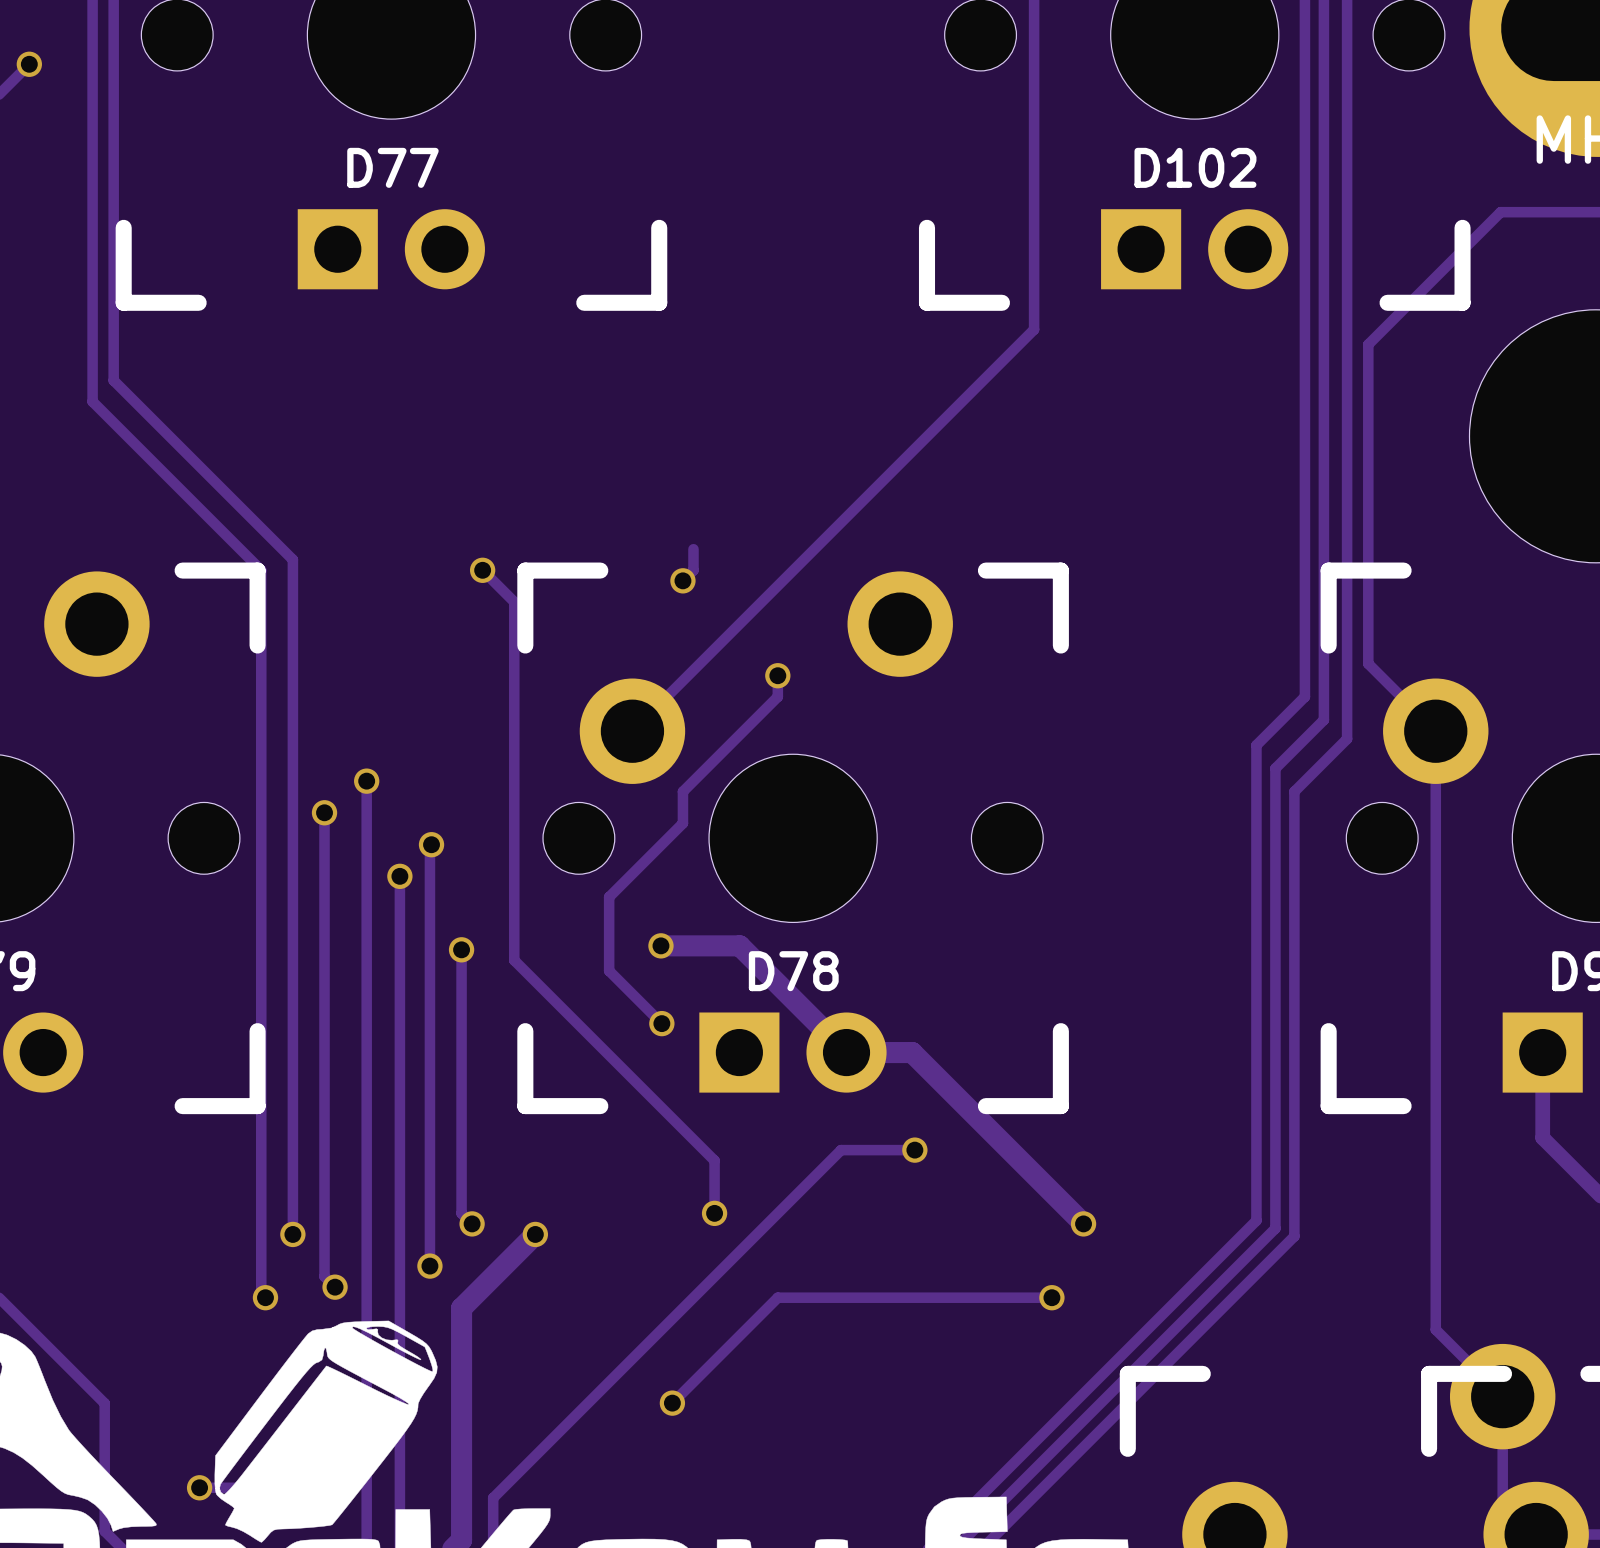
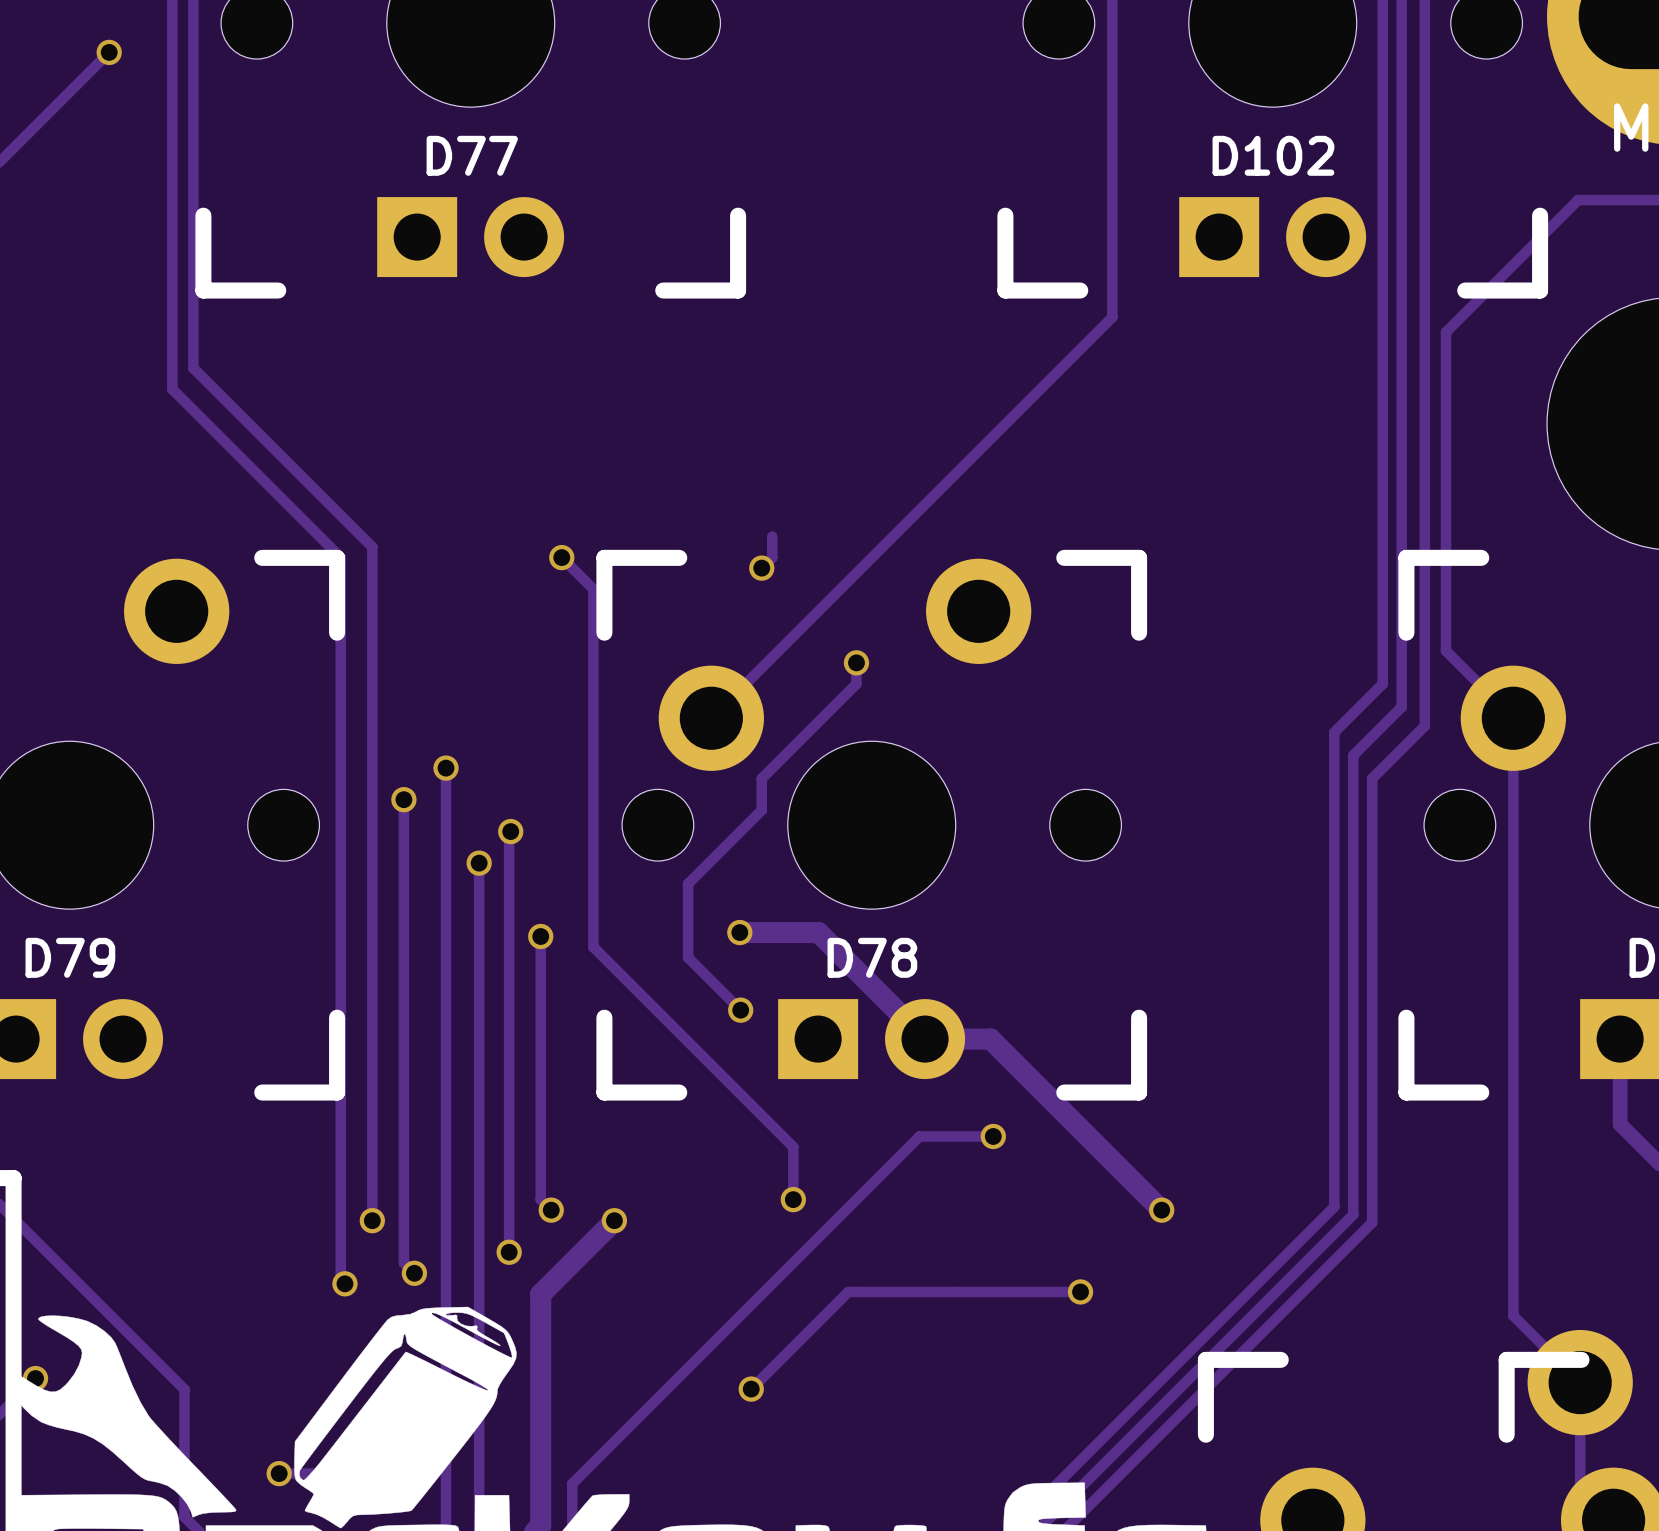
track: (1051, 1297) (777, 1297) (769, 1305) -> (1080, 1291) (848, 1291)
via position: (1051, 1297) -> (1080, 1291)

